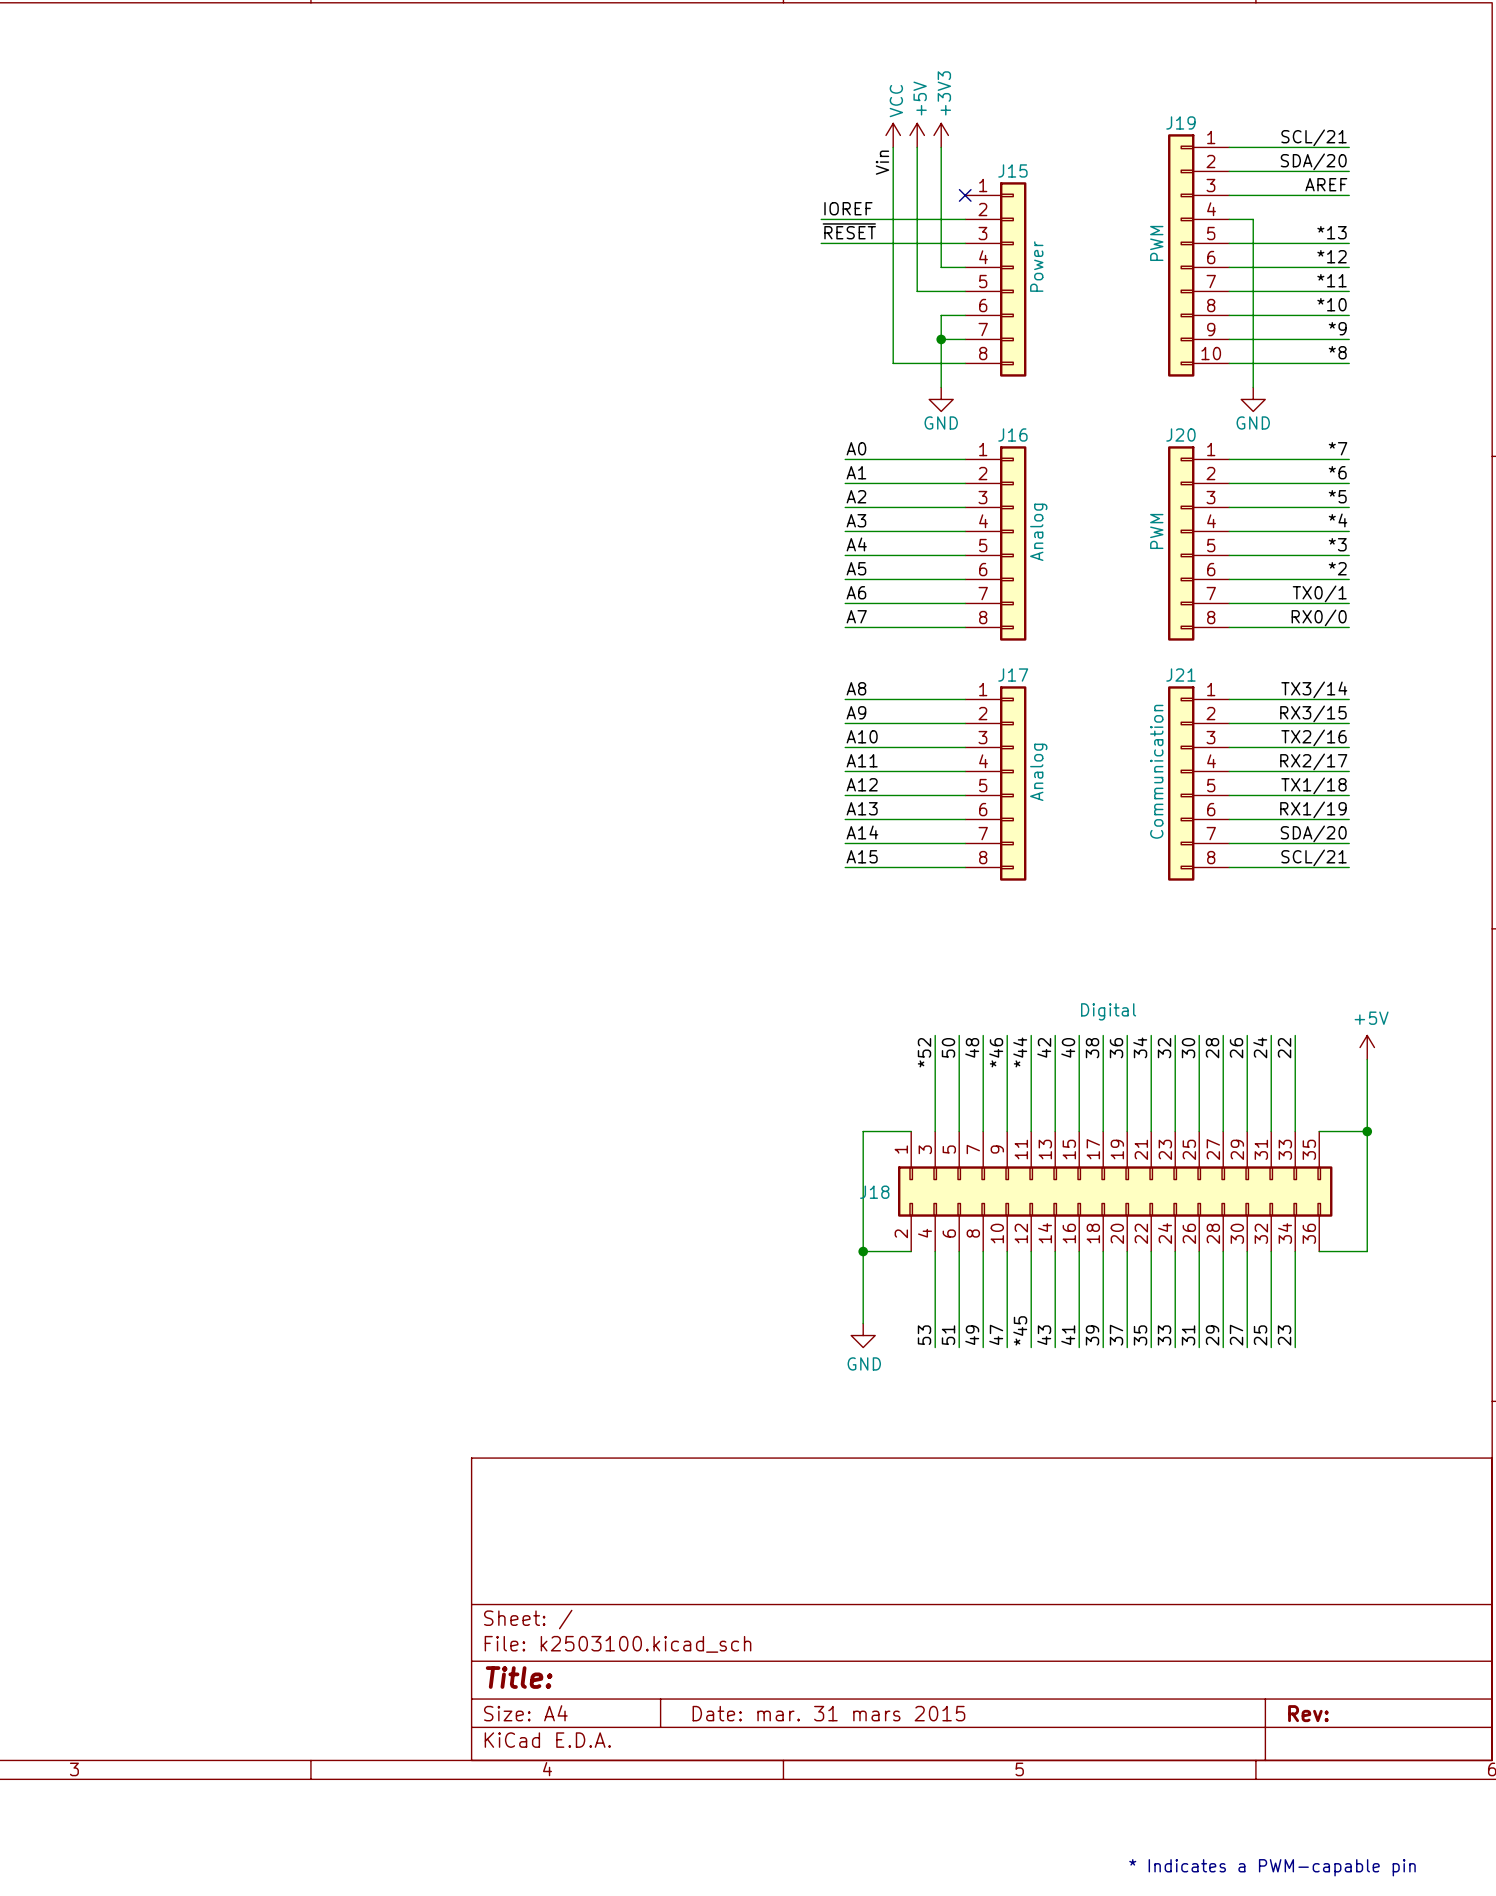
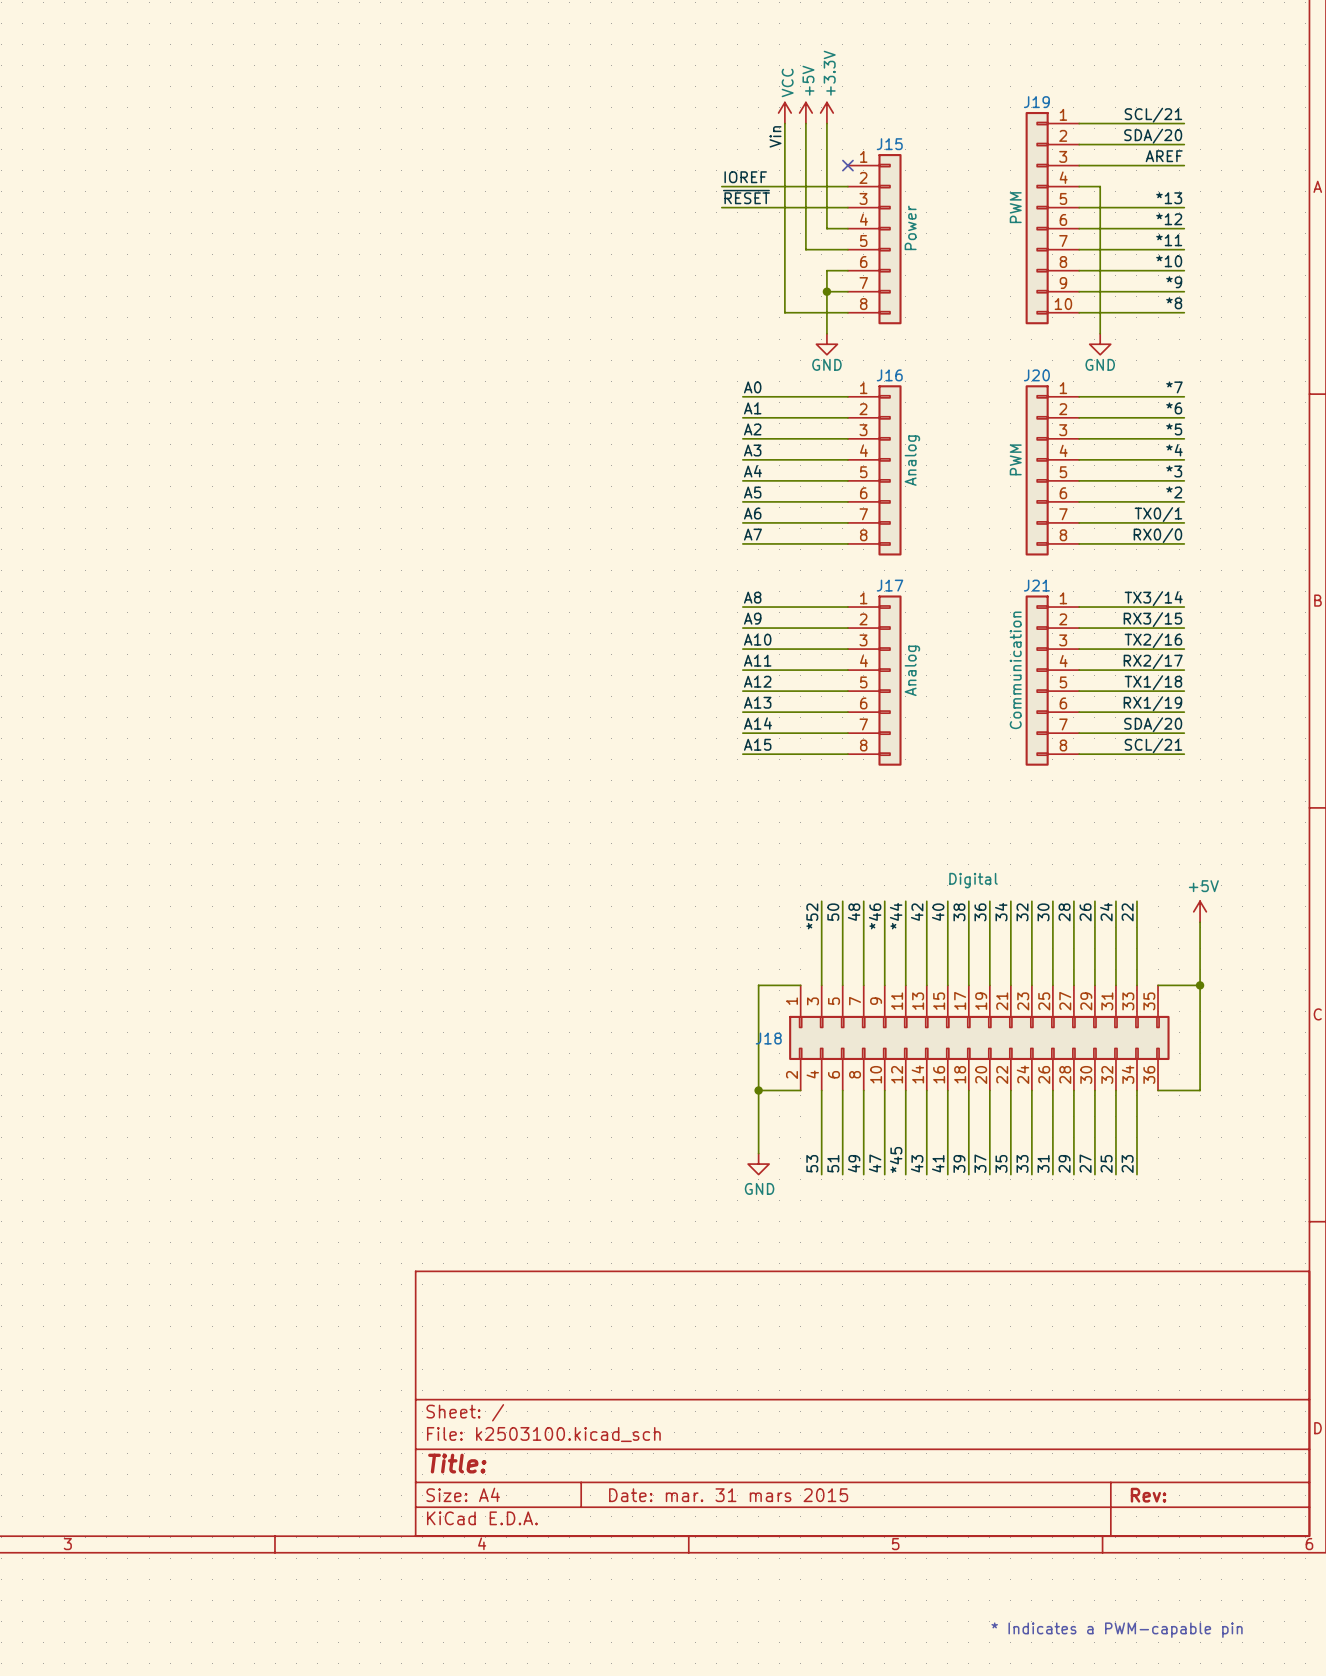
power symbol: +3V3 (941, 135) -> +3.3V (826, 113)

